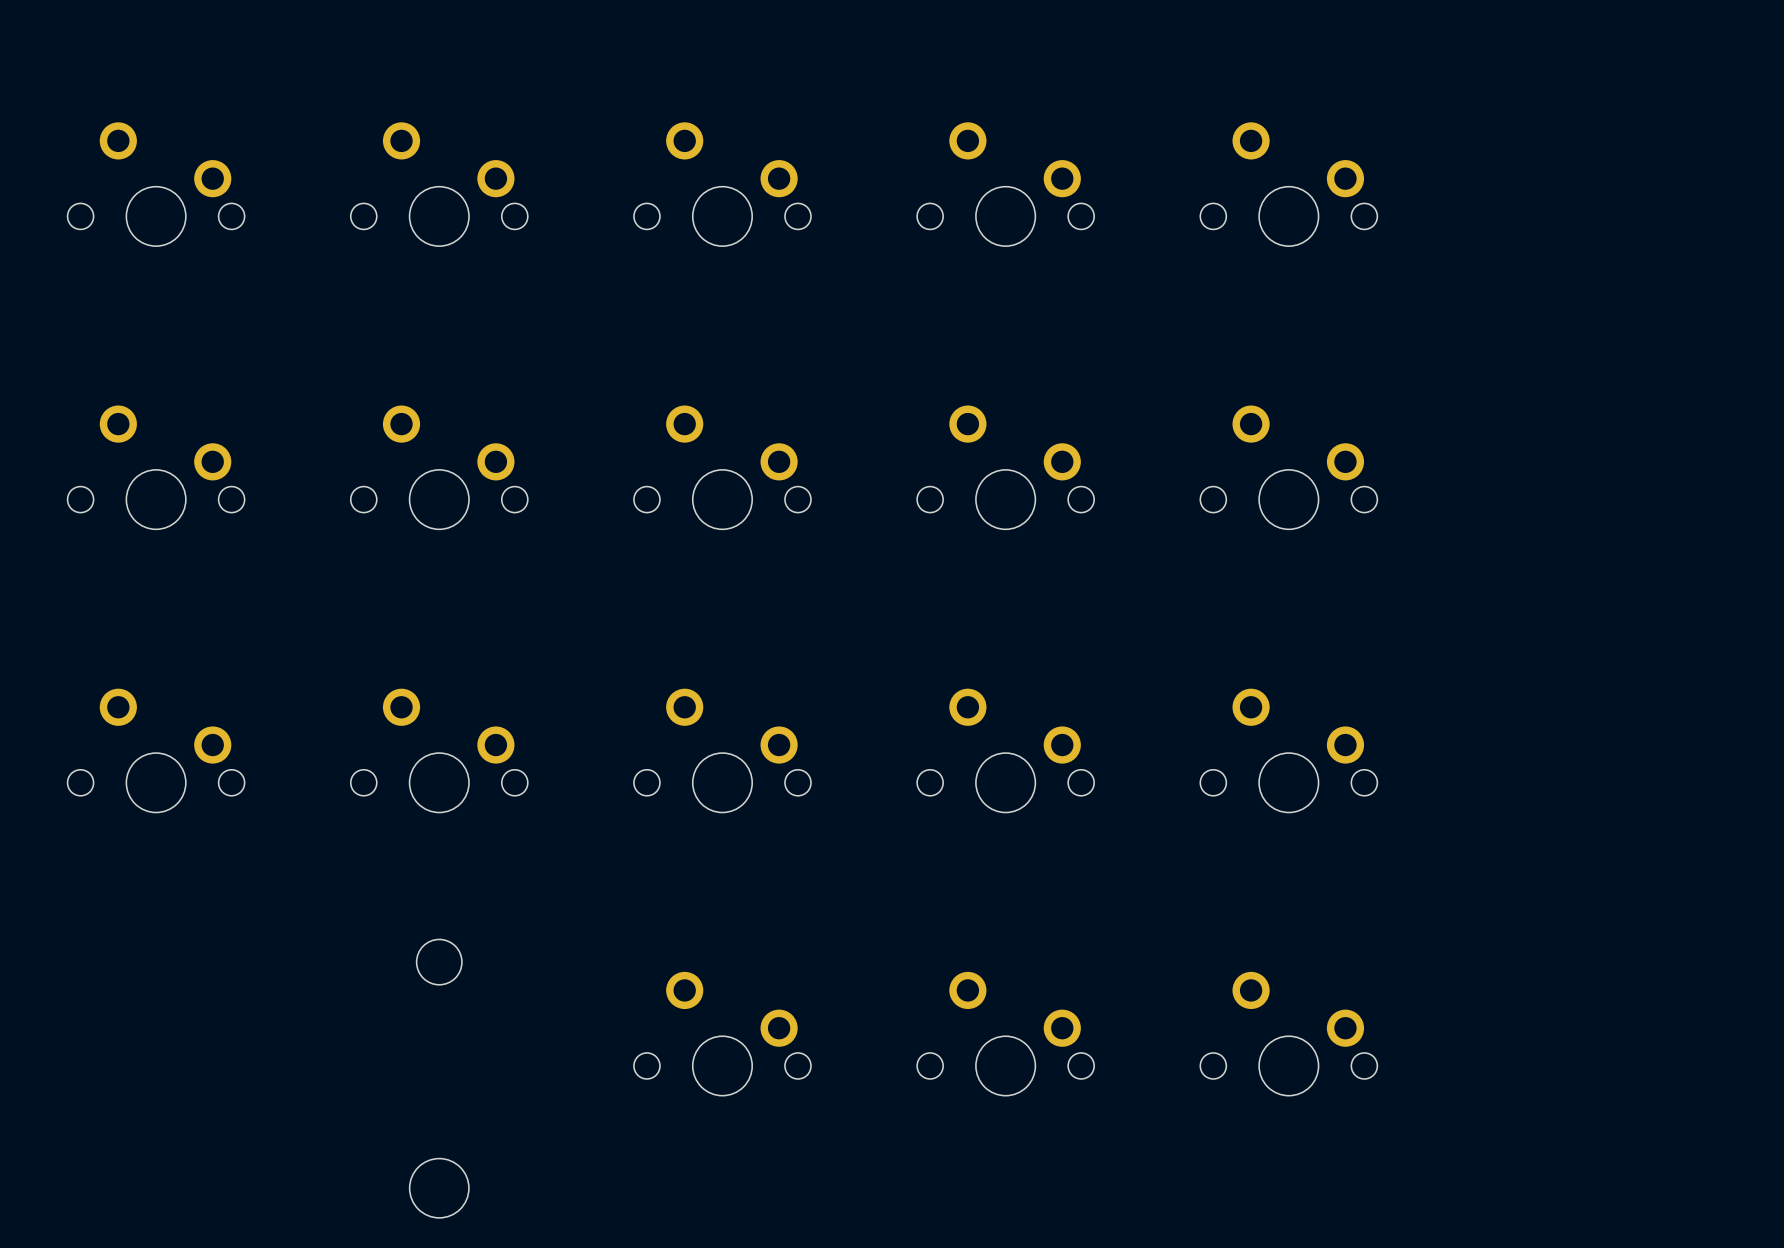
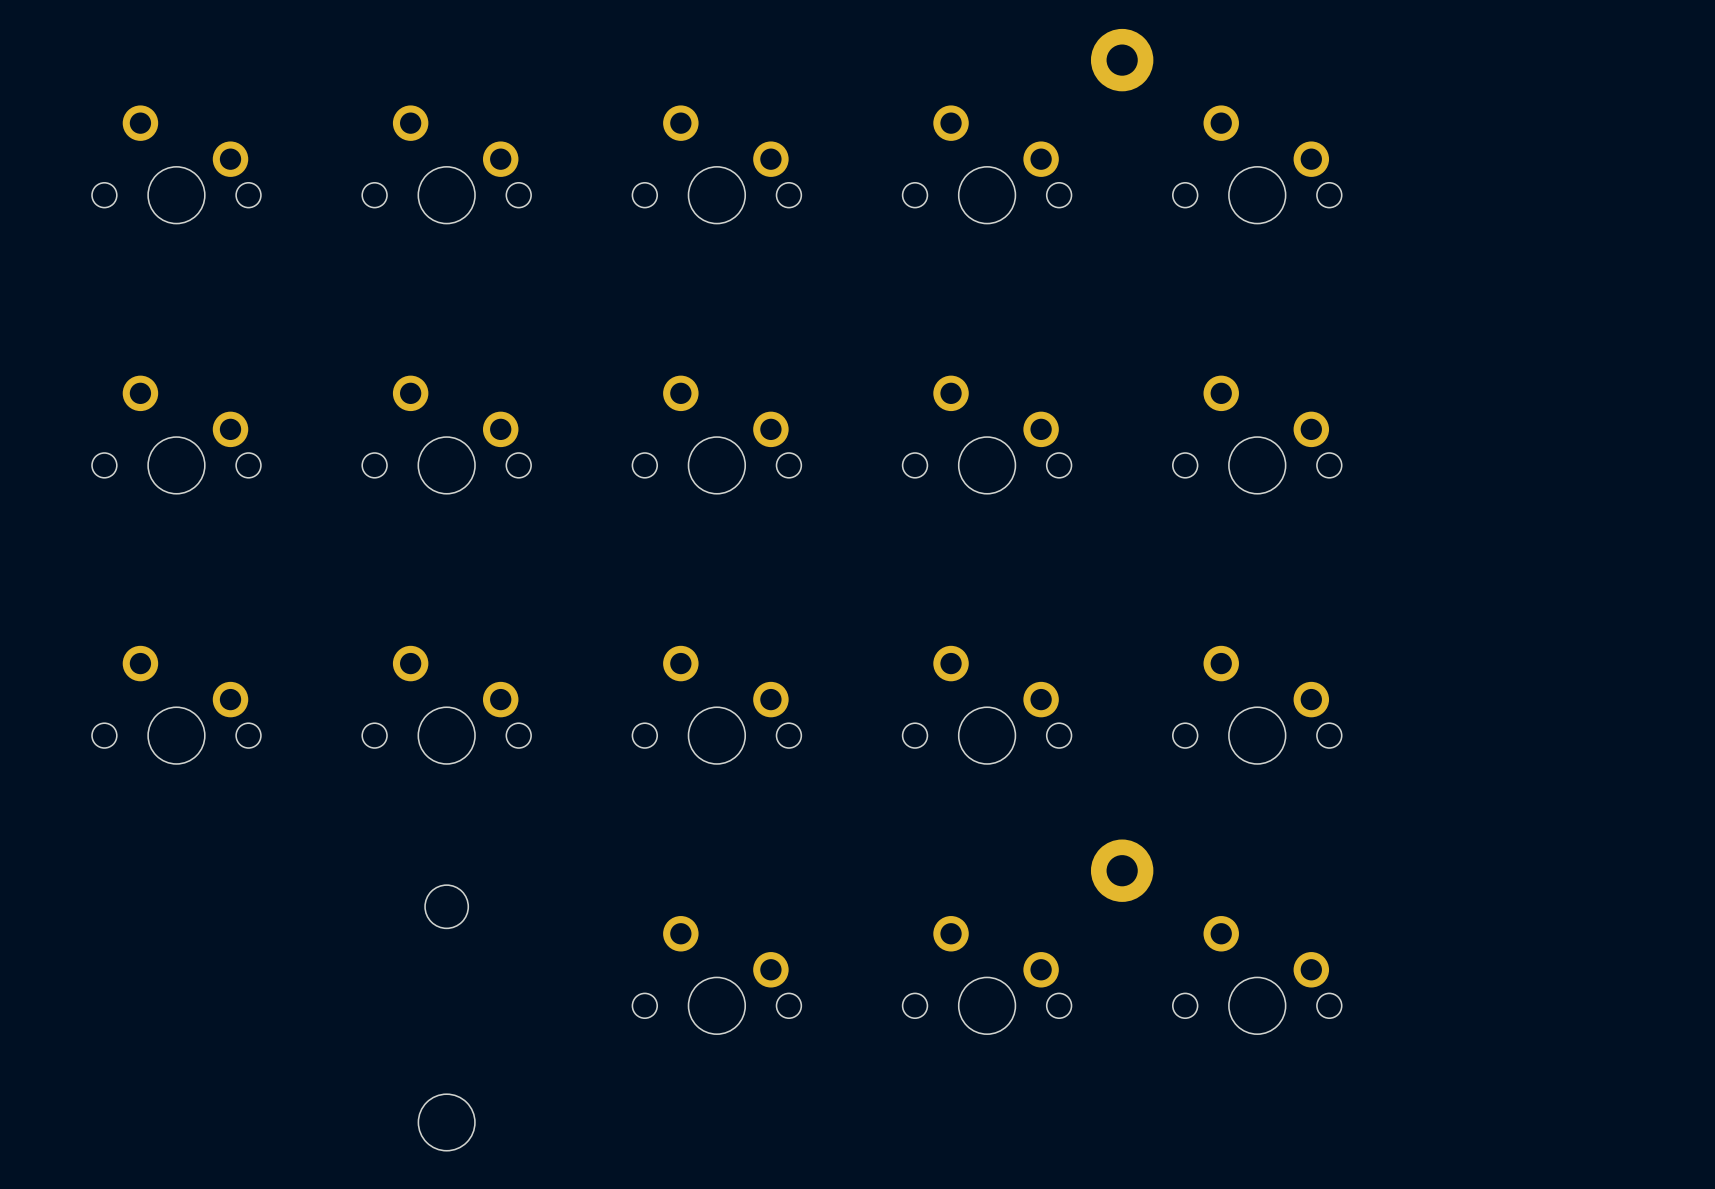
part: none -> (1122, 60)
part: none -> (1122, 870)

